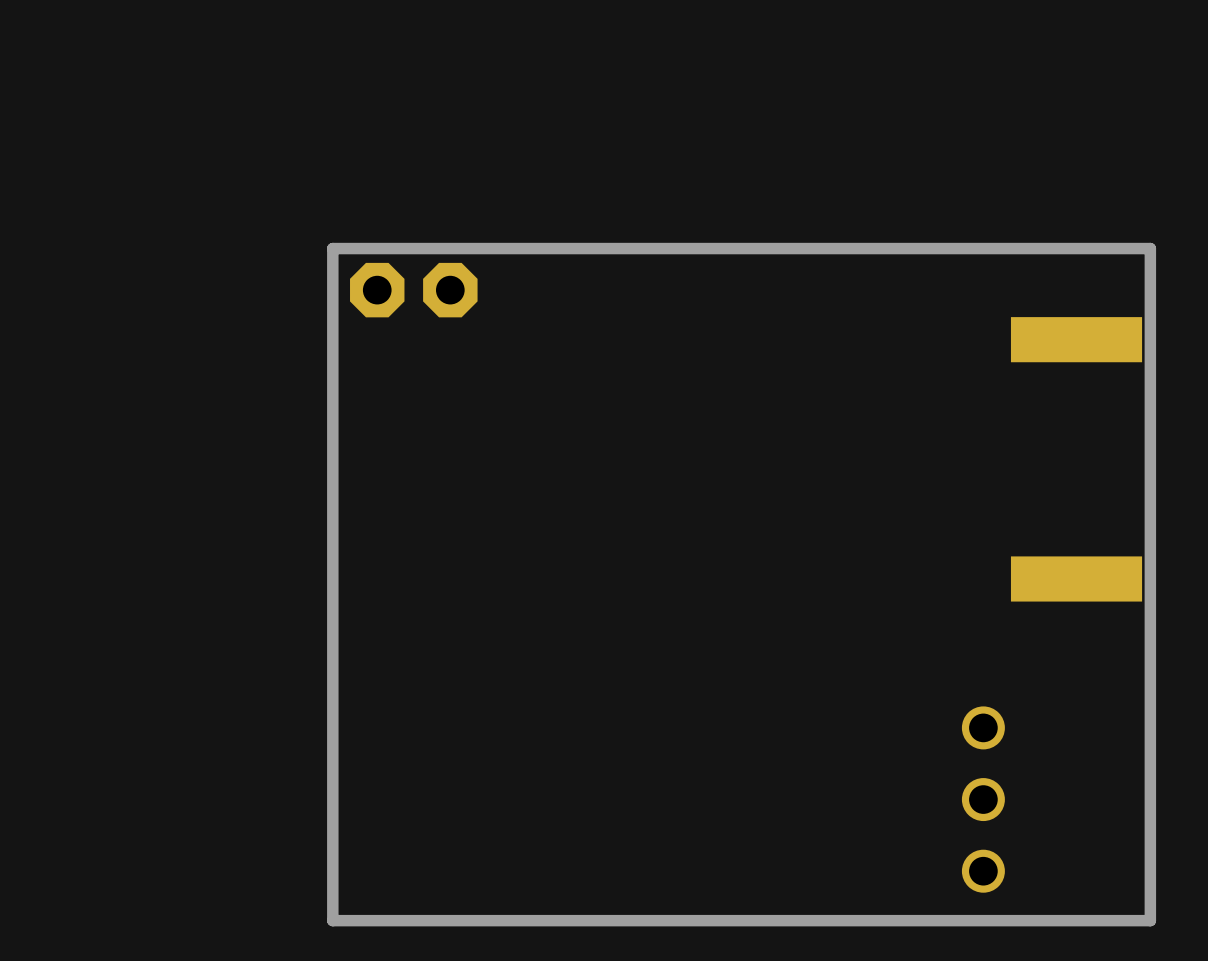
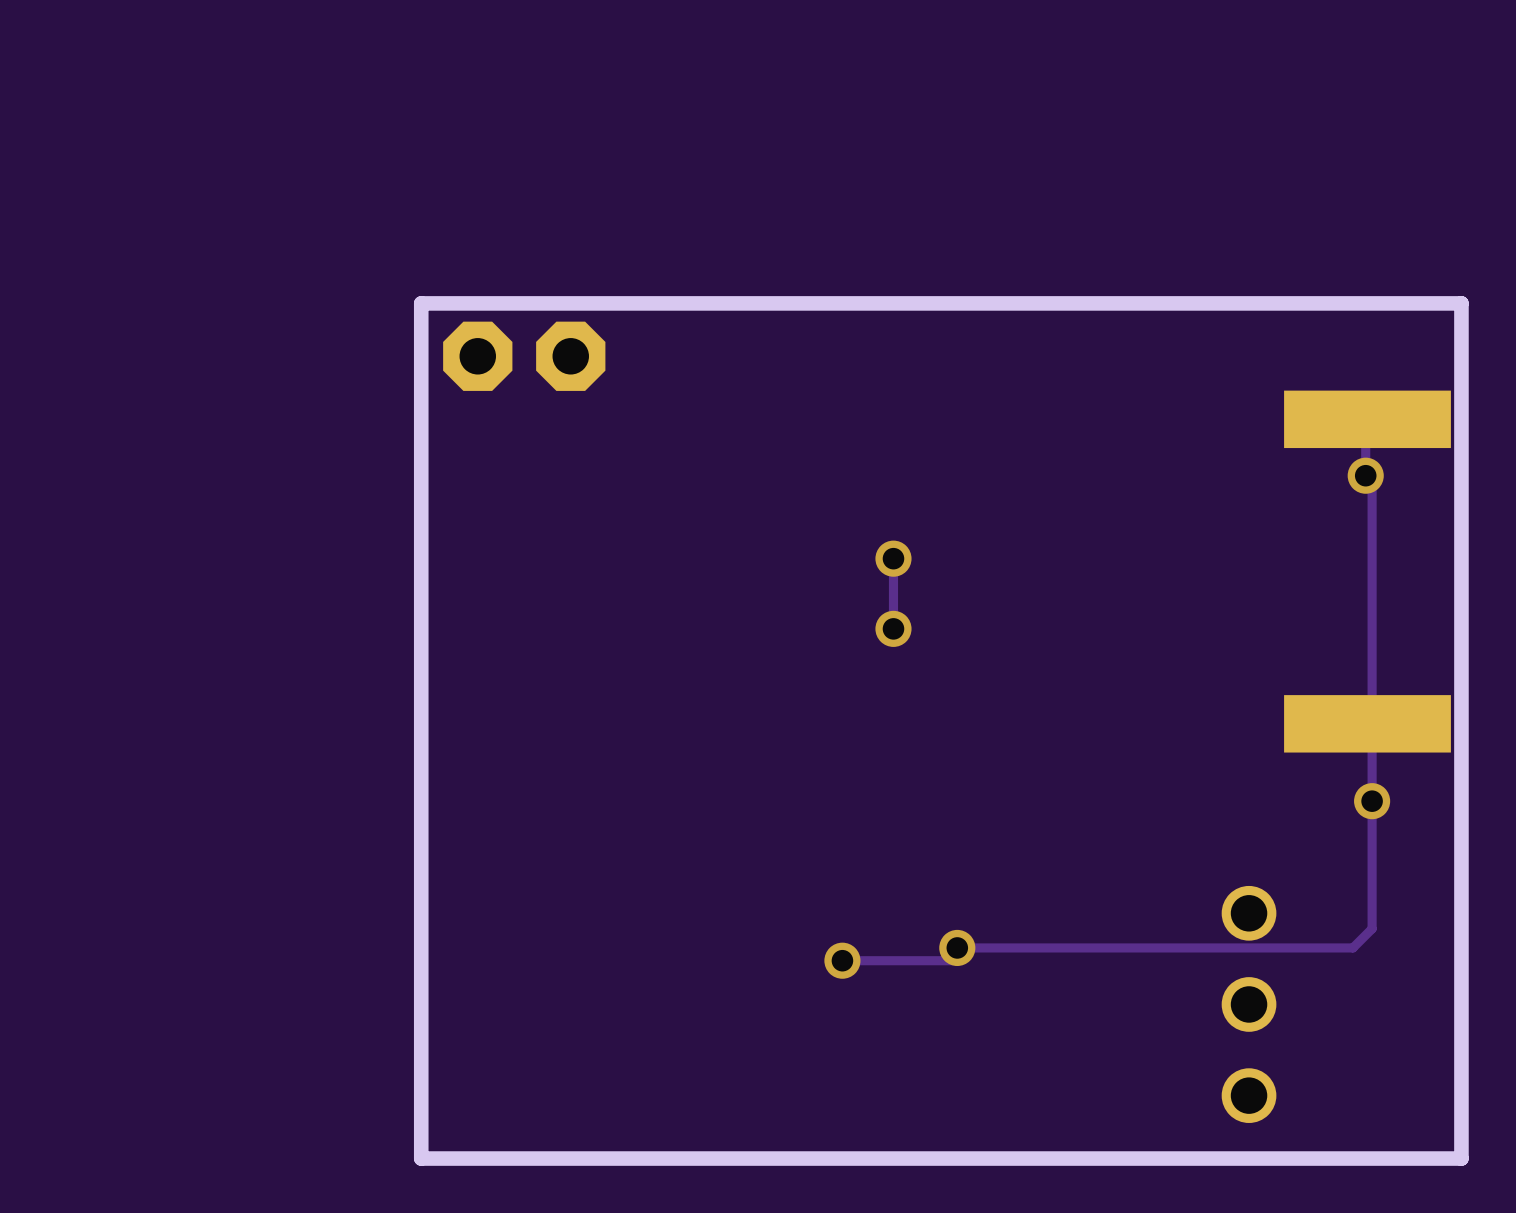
track: none -> (1365, 443) (1365, 475) (1372, 475) (1372, 928) (1352, 947) (957, 947) (957, 960) (842, 960)
via: none -> (1365, 475)
track: none -> (893, 558) (893, 628)
via: none -> (893, 558)
via: none -> (893, 628)
via: none -> (1372, 801)
via: none -> (957, 947)
via: none -> (842, 960)

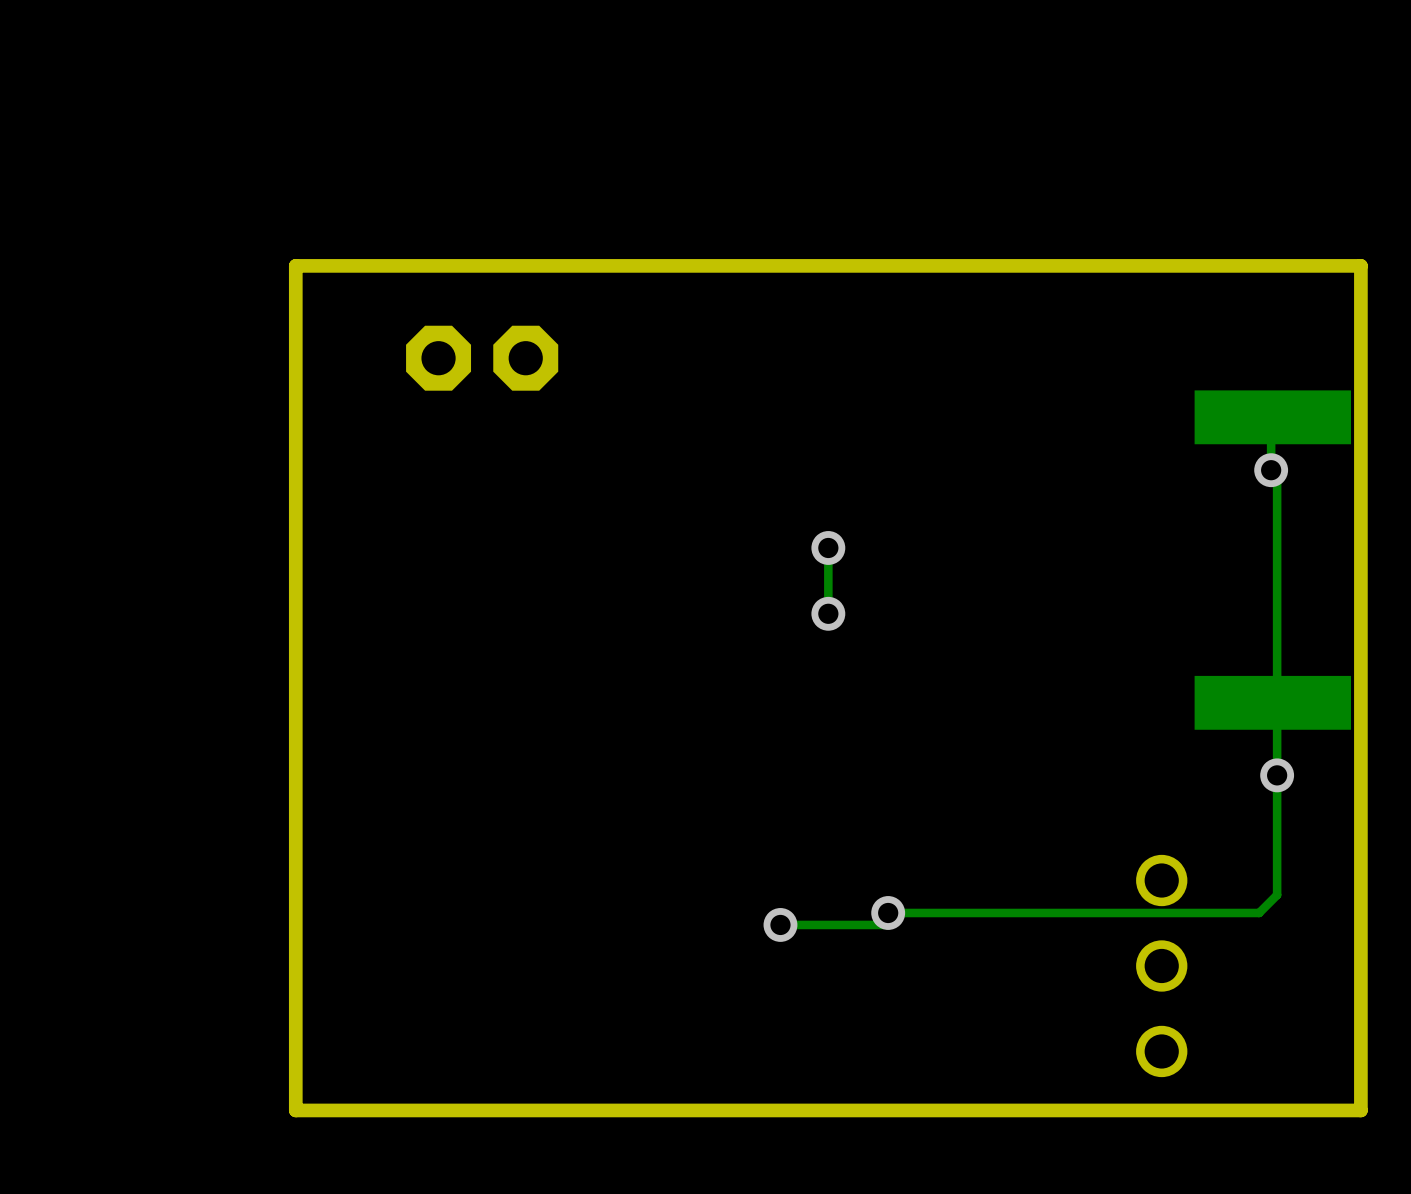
board edge: (1461, 303) (421, 303) (421, 1158) -> (1360, 308) (1360, 265) (295, 265) (295, 1110) (385, 1110)

